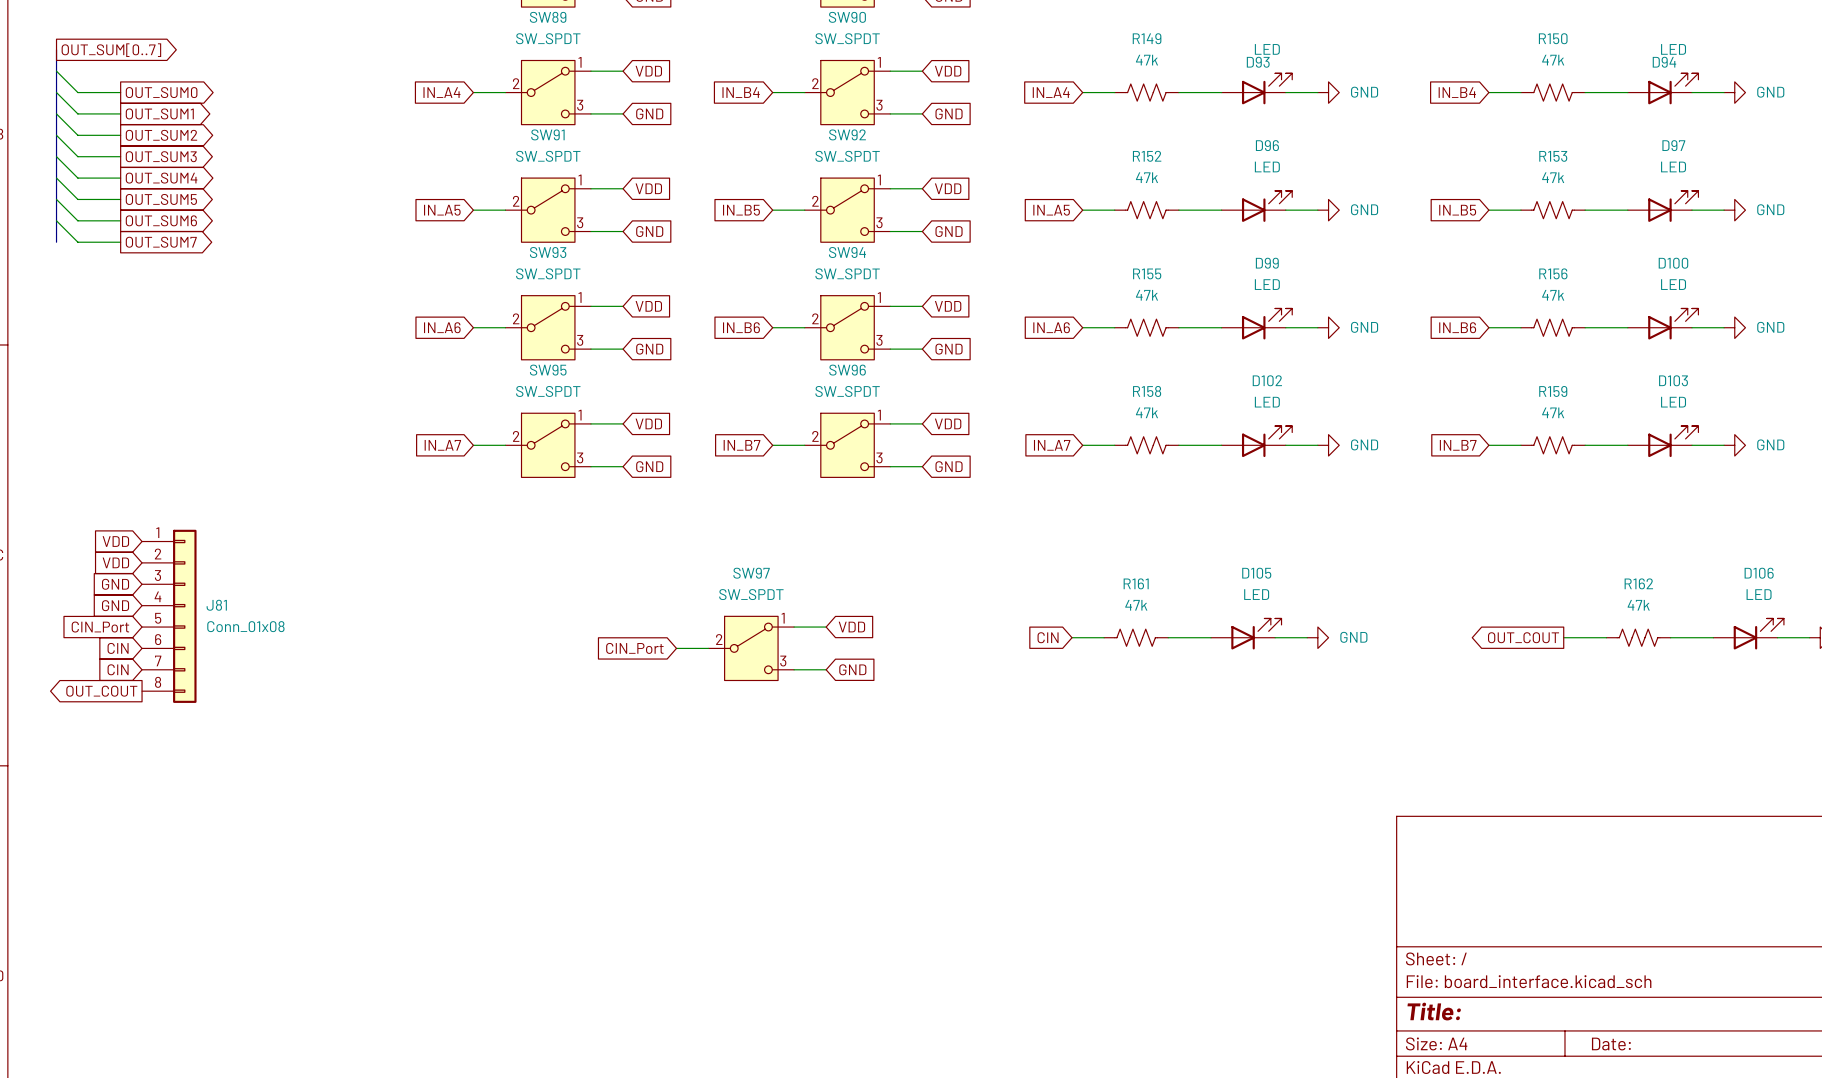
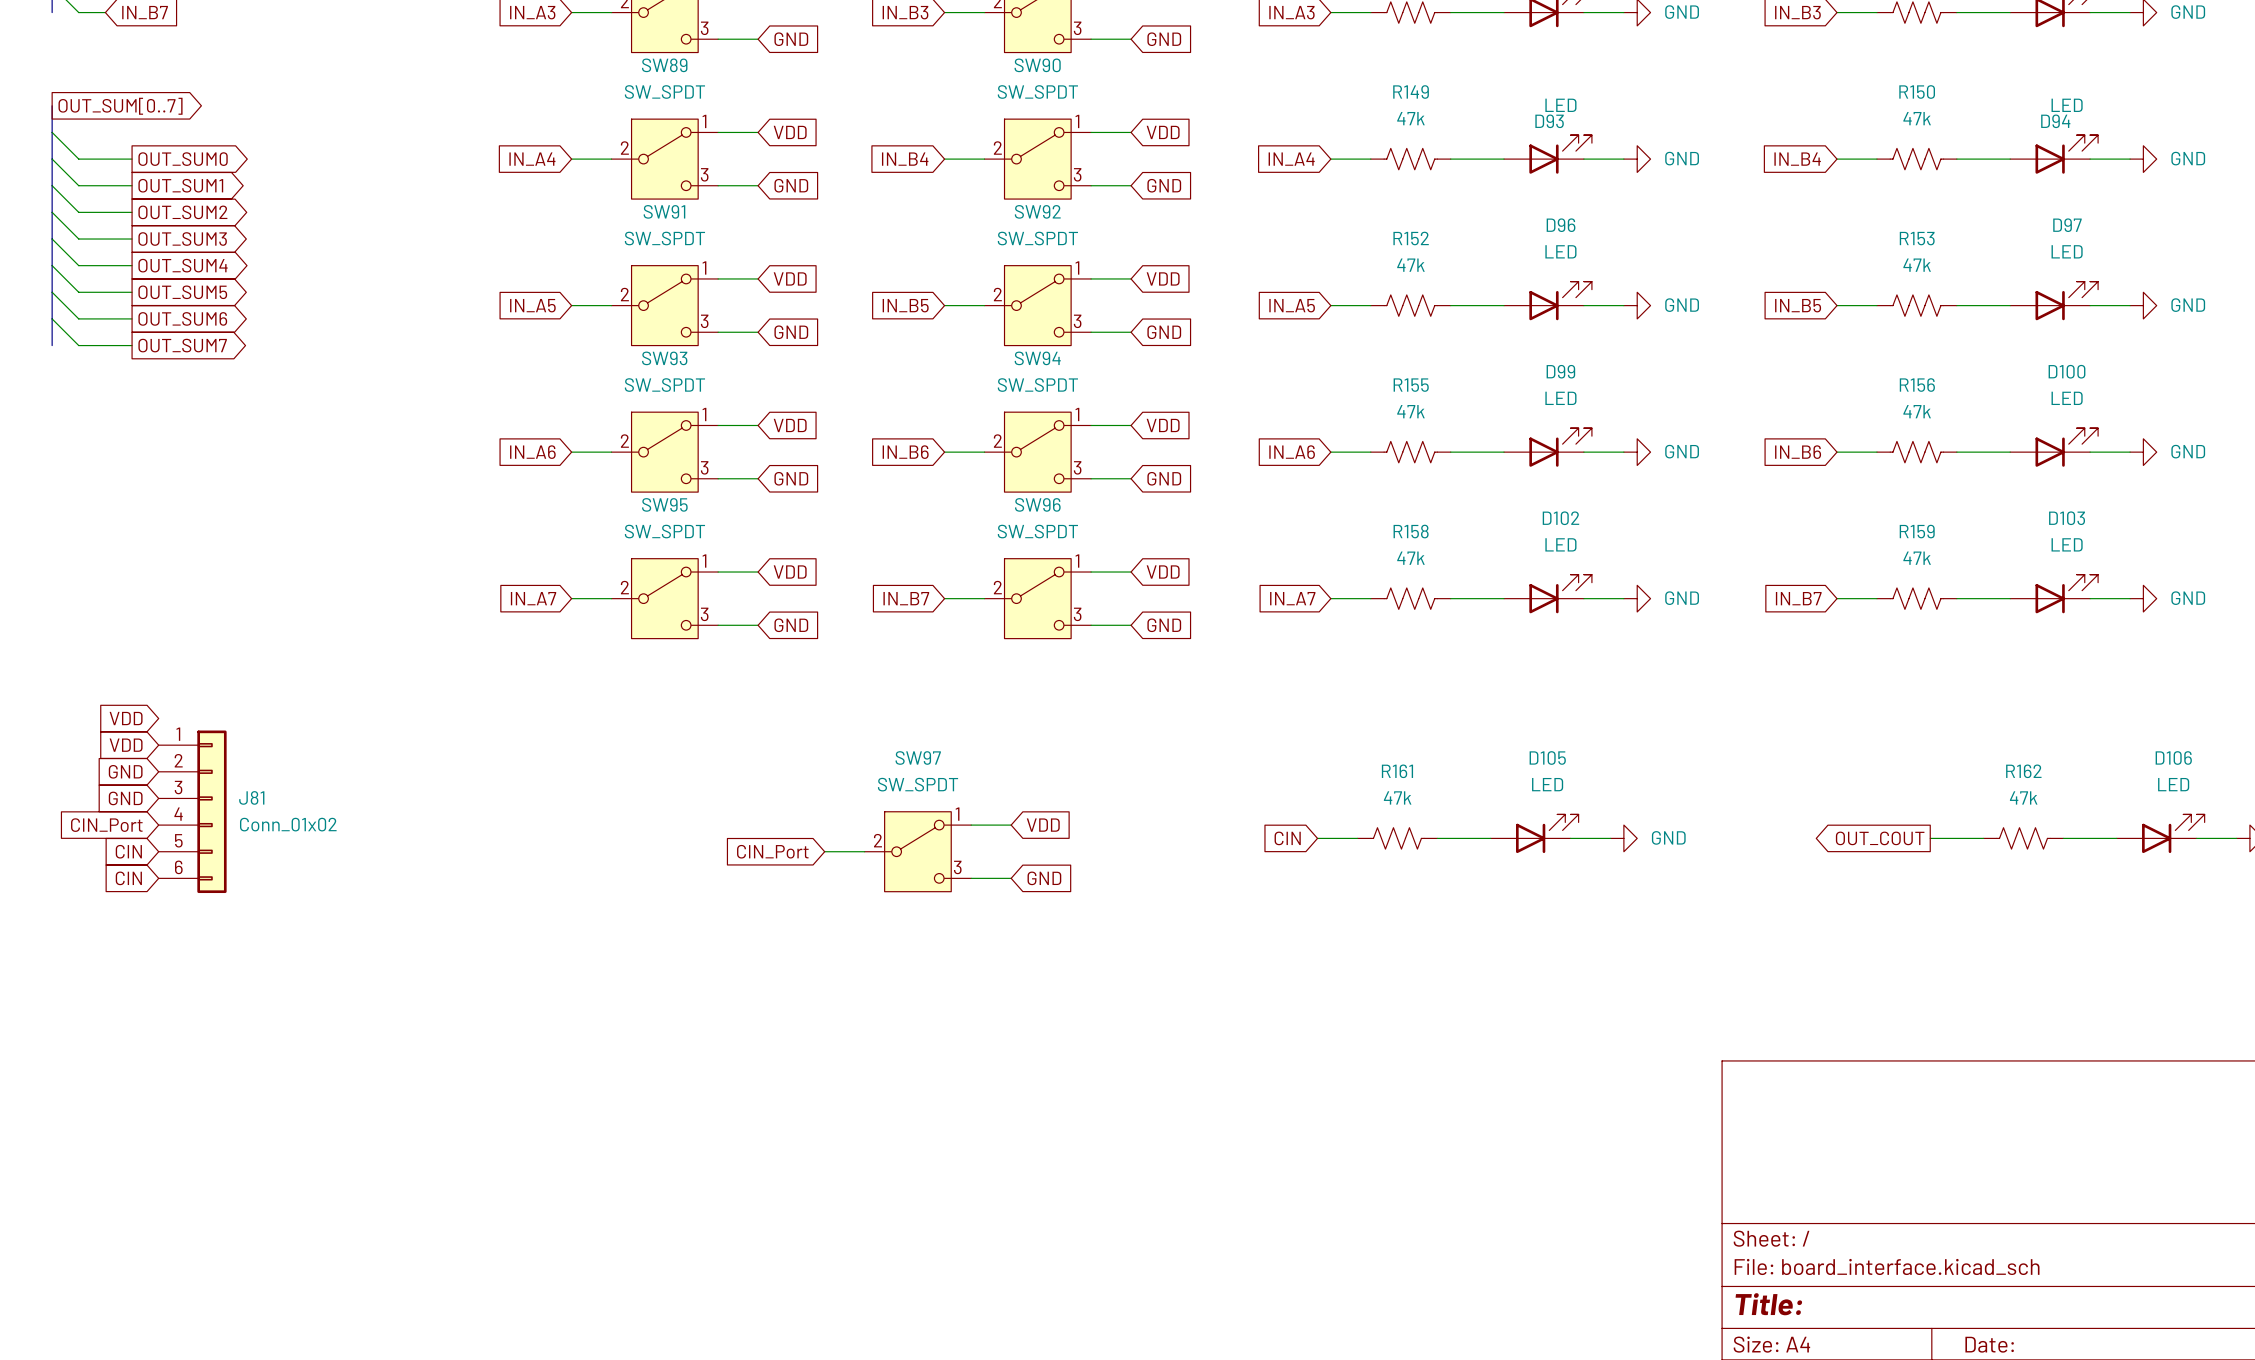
J81 symbol: [142, 529, 197, 703] -> [158, 730, 227, 894]
J81 value: Conn_01x08 (245, 626) -> Conn_01x02 (288, 824)
global label: OUT_COUT (101, 691) -> none

